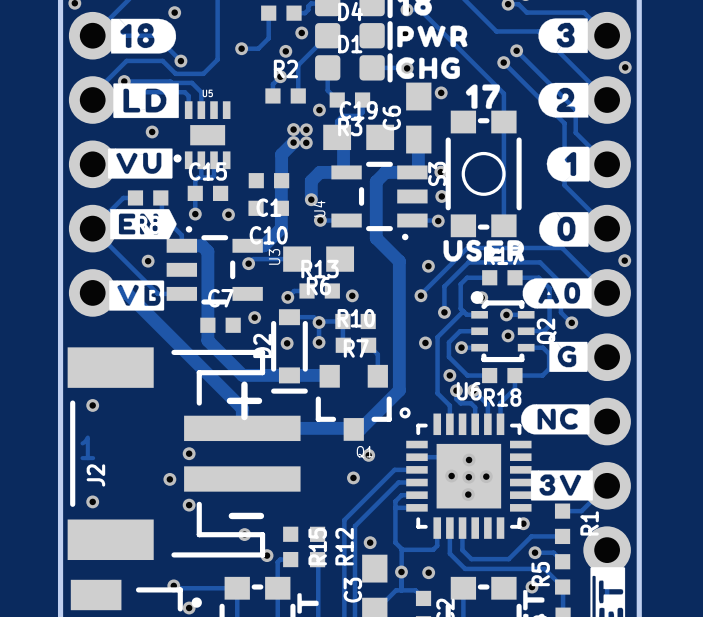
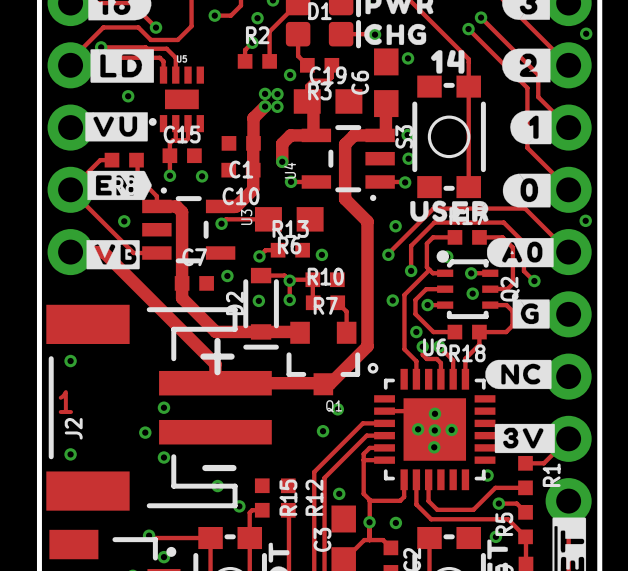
drawing shape: [465, 84, 501, 109] -> [430, 50, 465, 74]

